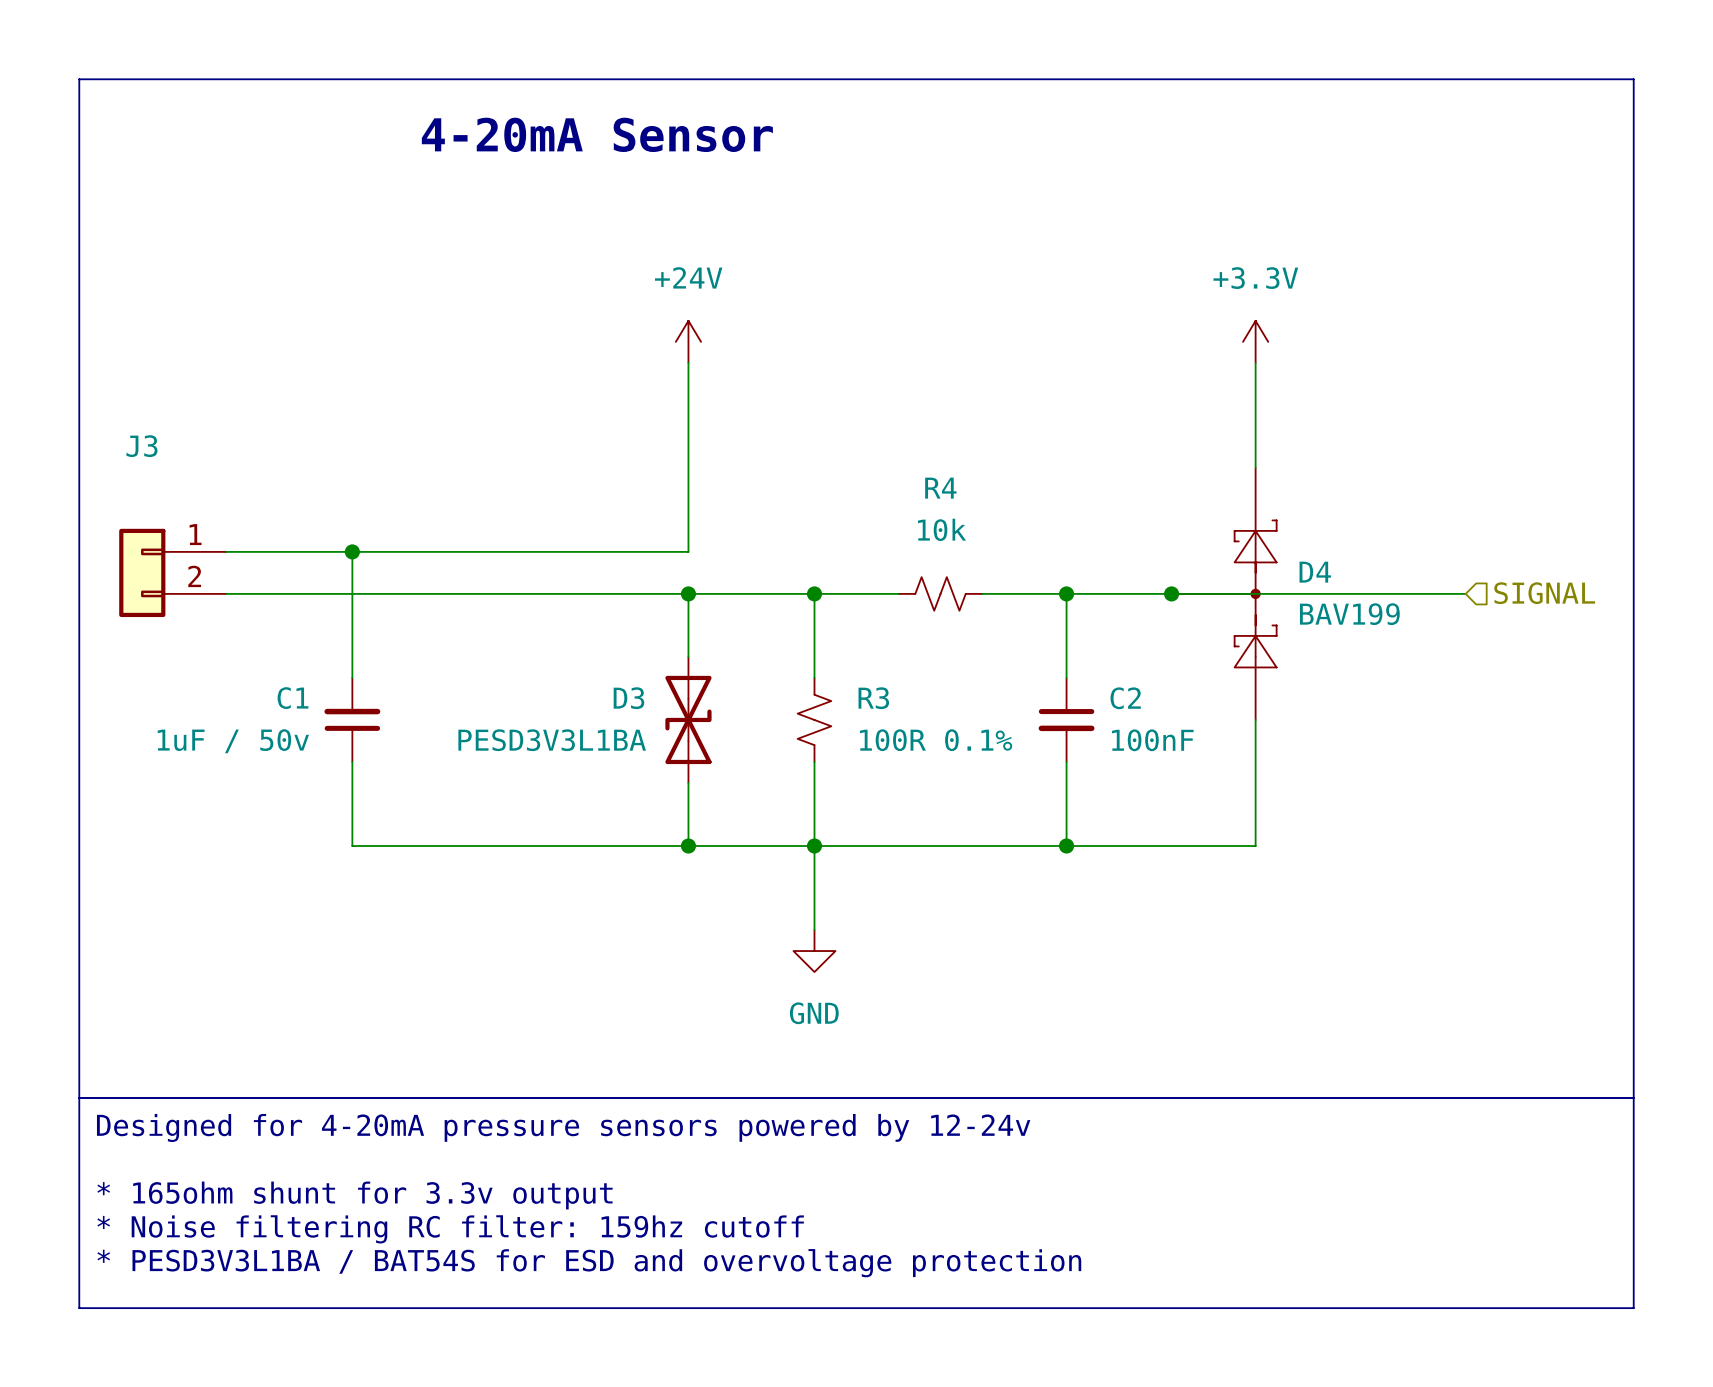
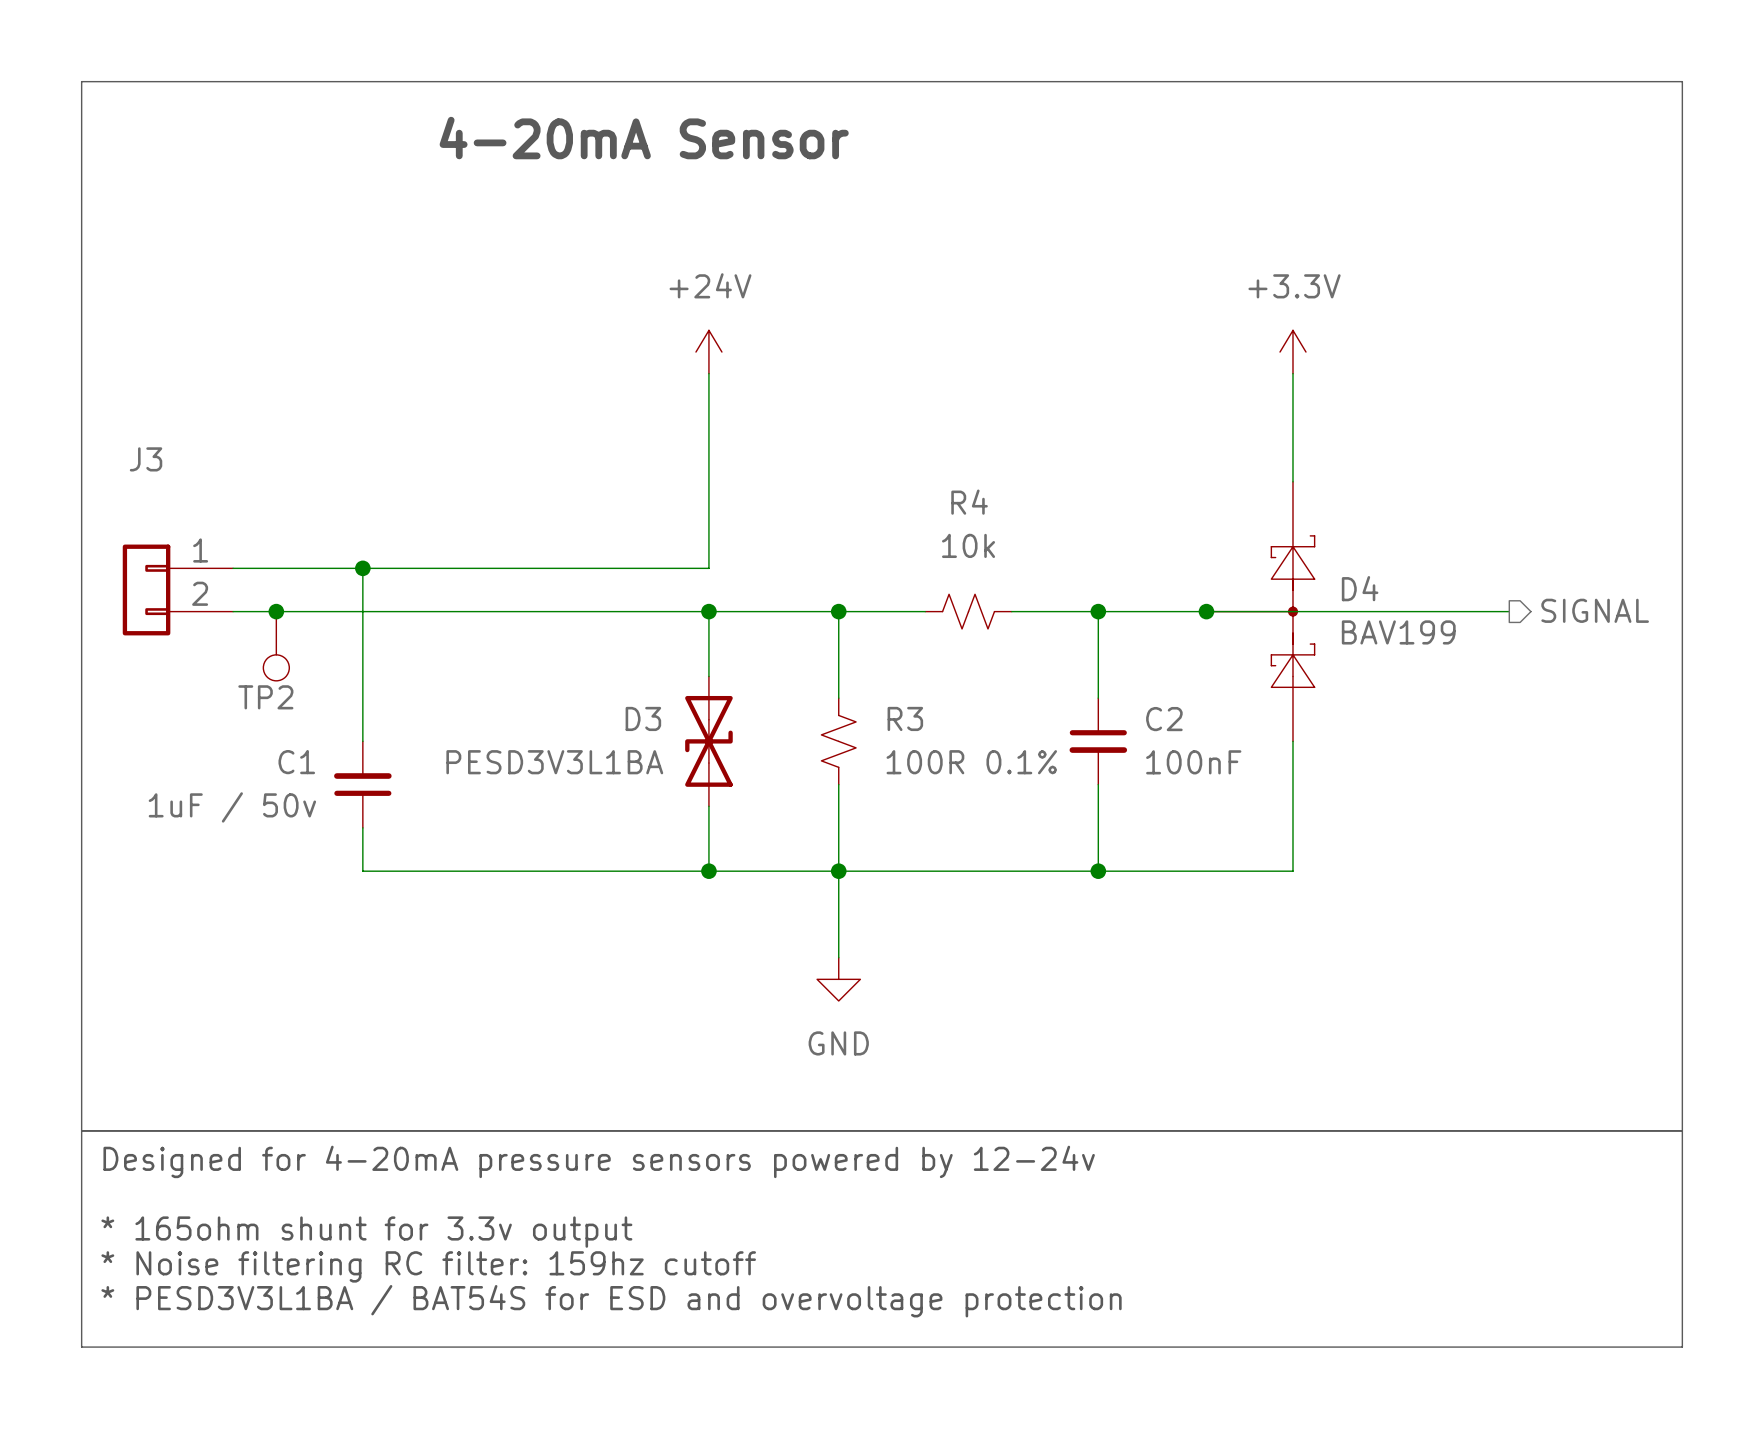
junction: none -> (276, 611)
hierarchical label shape: input (1544, 593) -> output (1595, 610)
TP2: none -> (276, 646)
C1 position: (352, 719) -> (362, 784)

